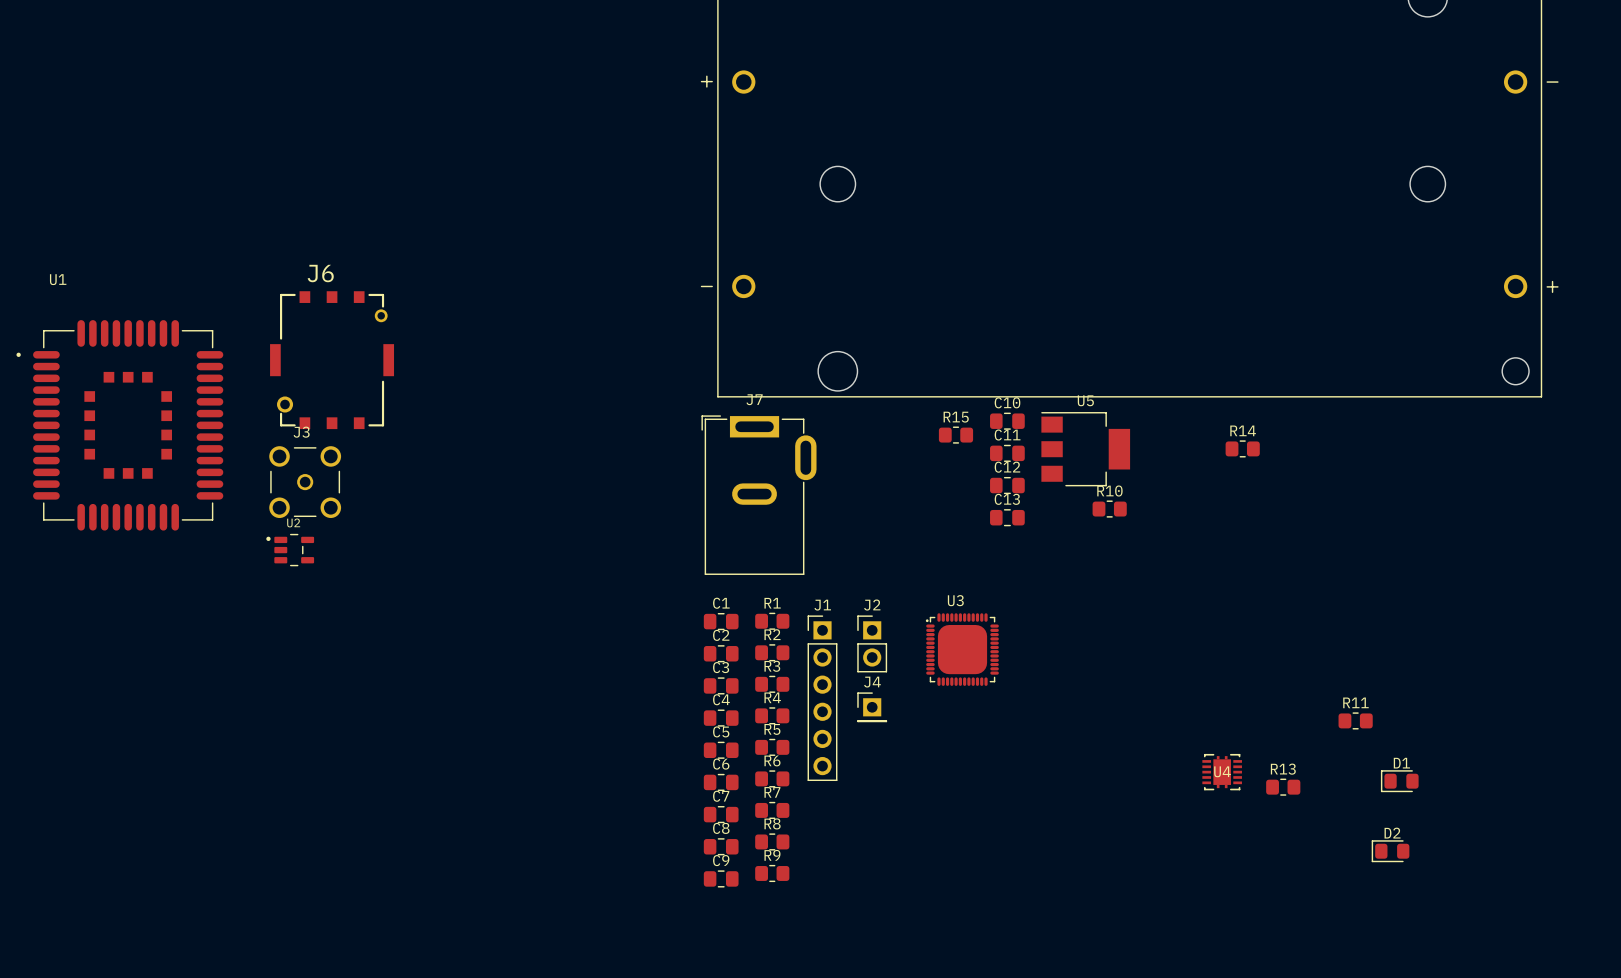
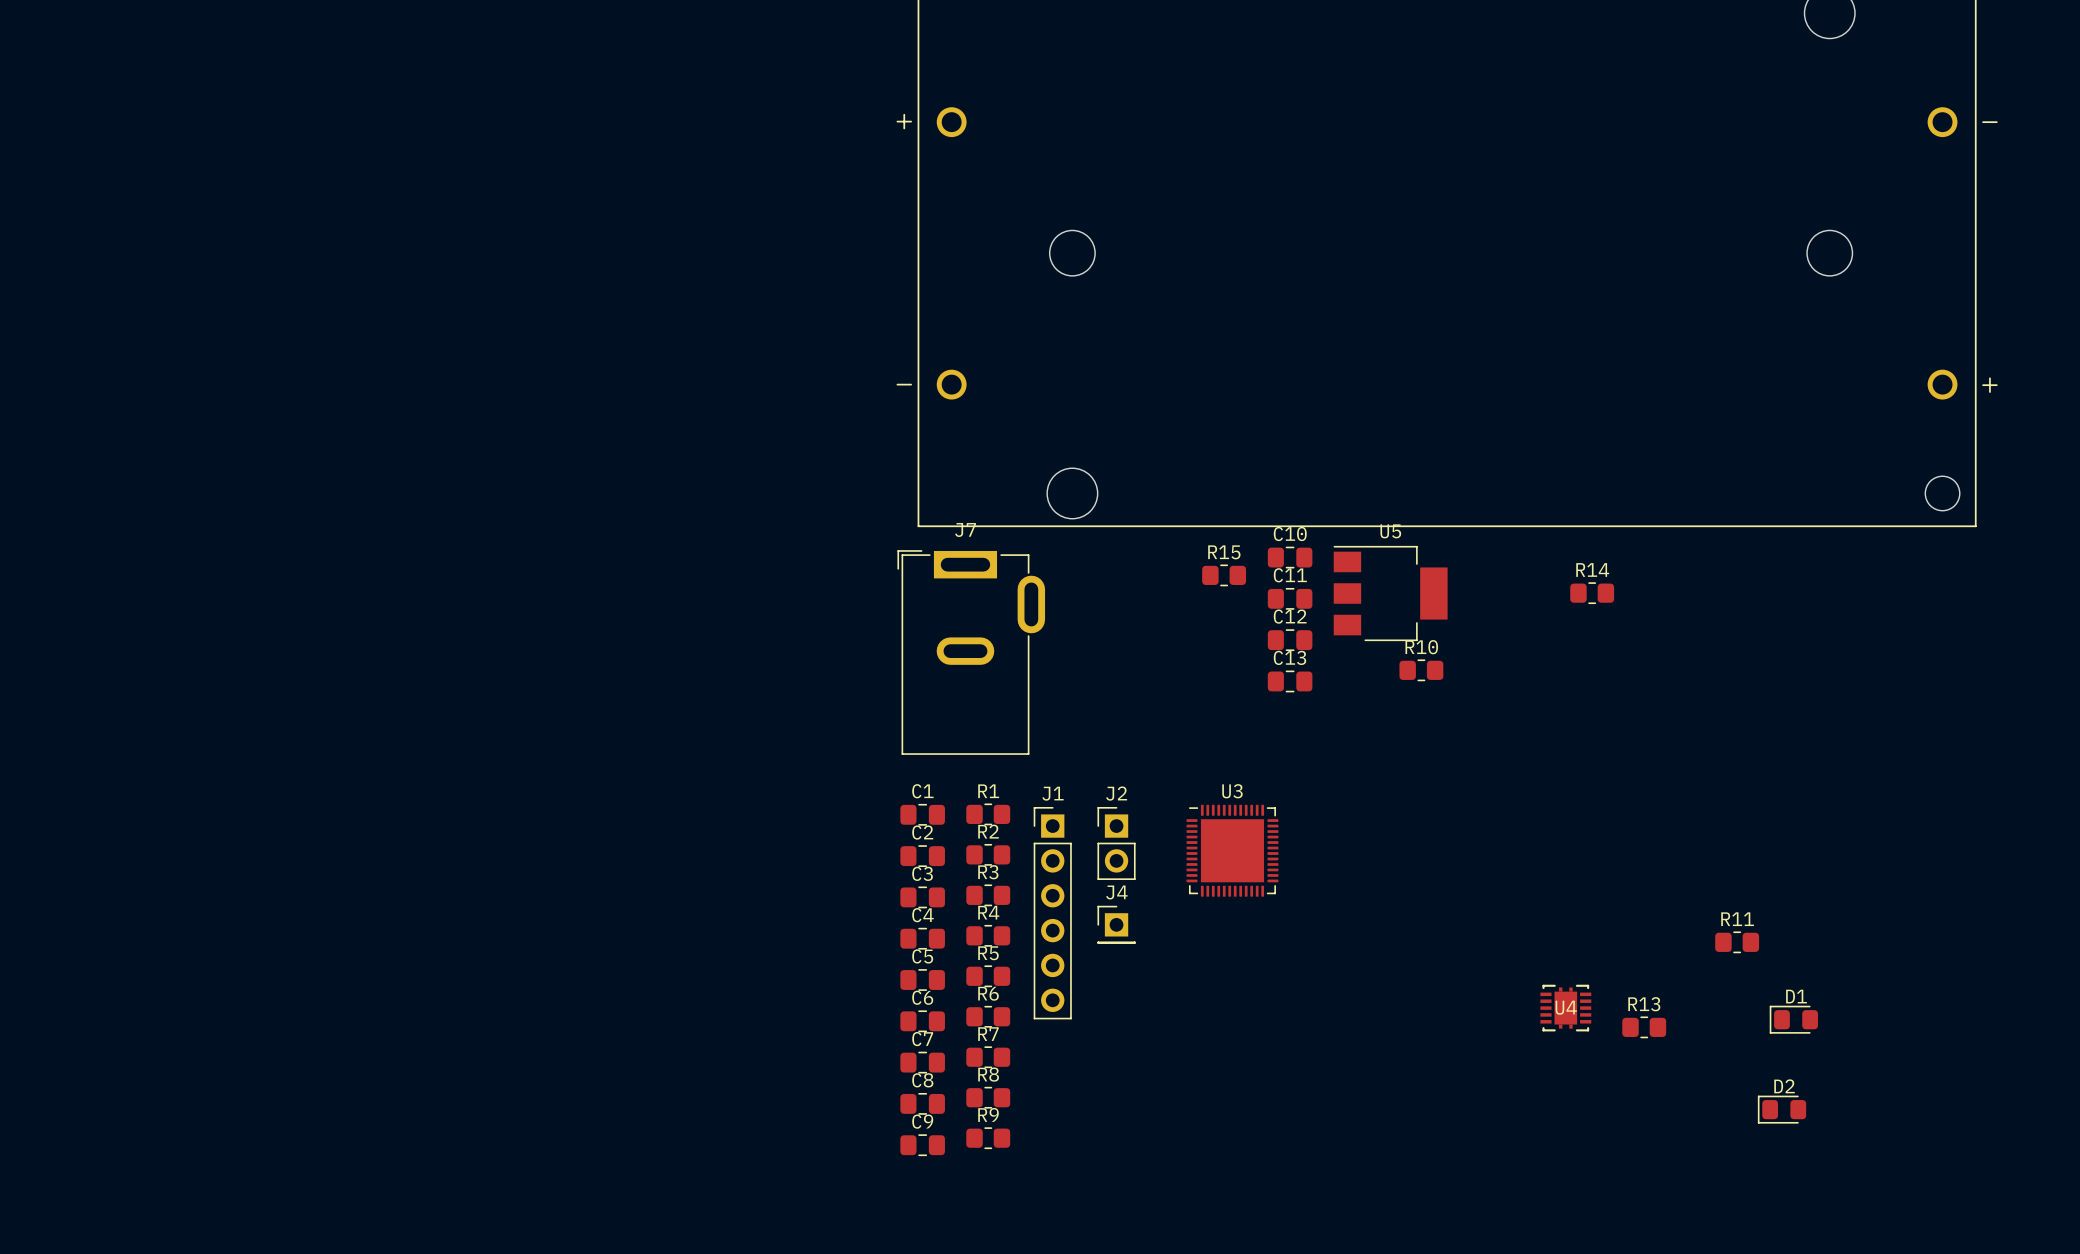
J6: (332, 360) -> none
U1: (119, 425) -> none
J3: (305, 482) -> none
U2: (290, 550) -> none
U3 footprint: [925, 613, 999, 686] -> [1186, 804, 1279, 897]

